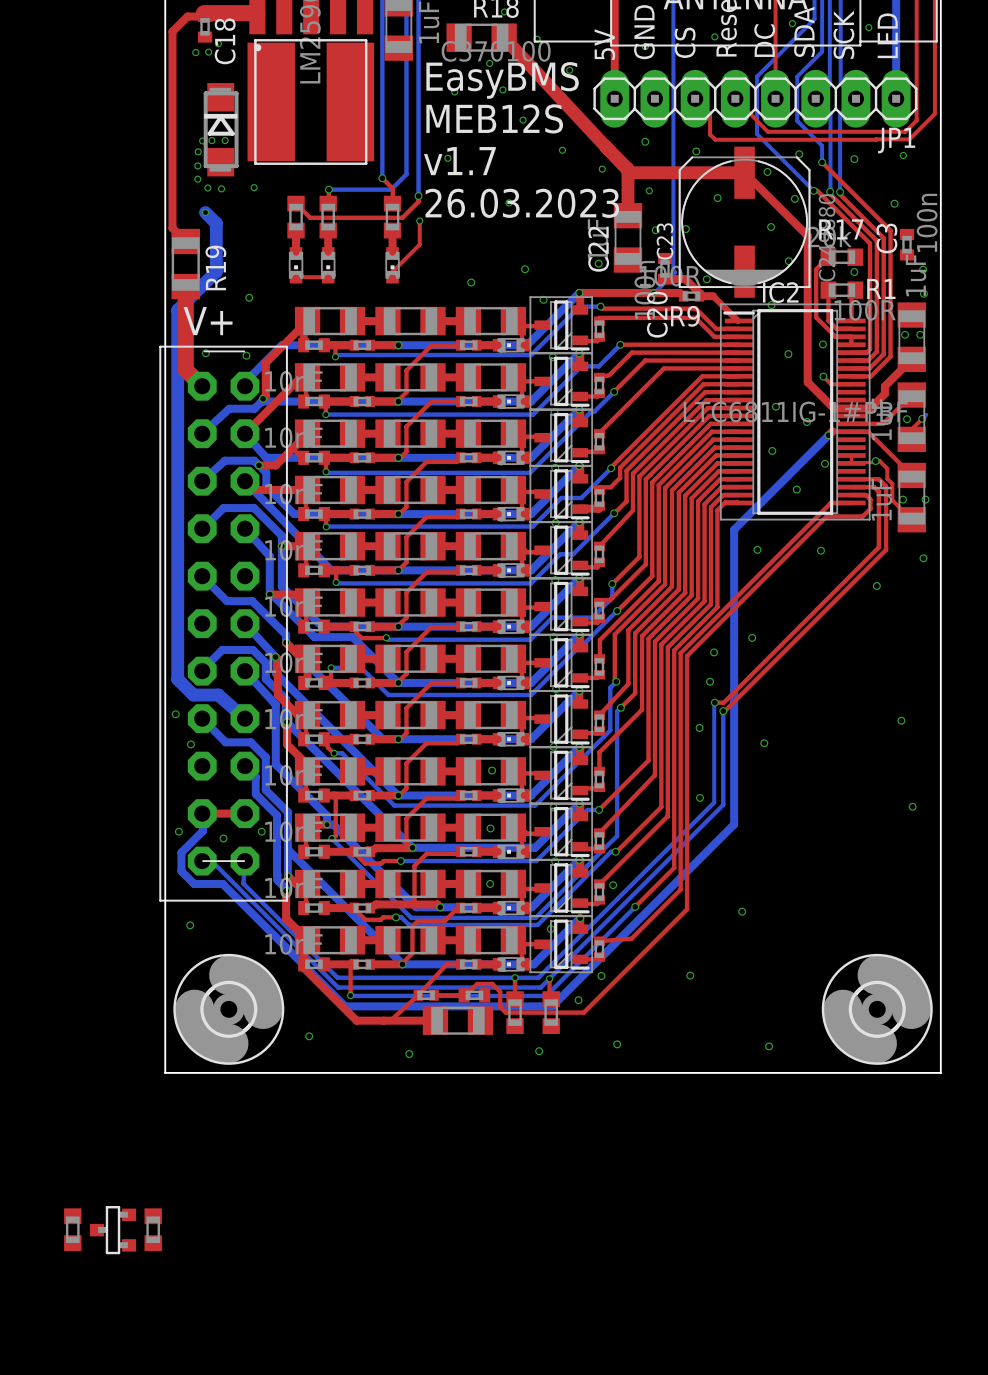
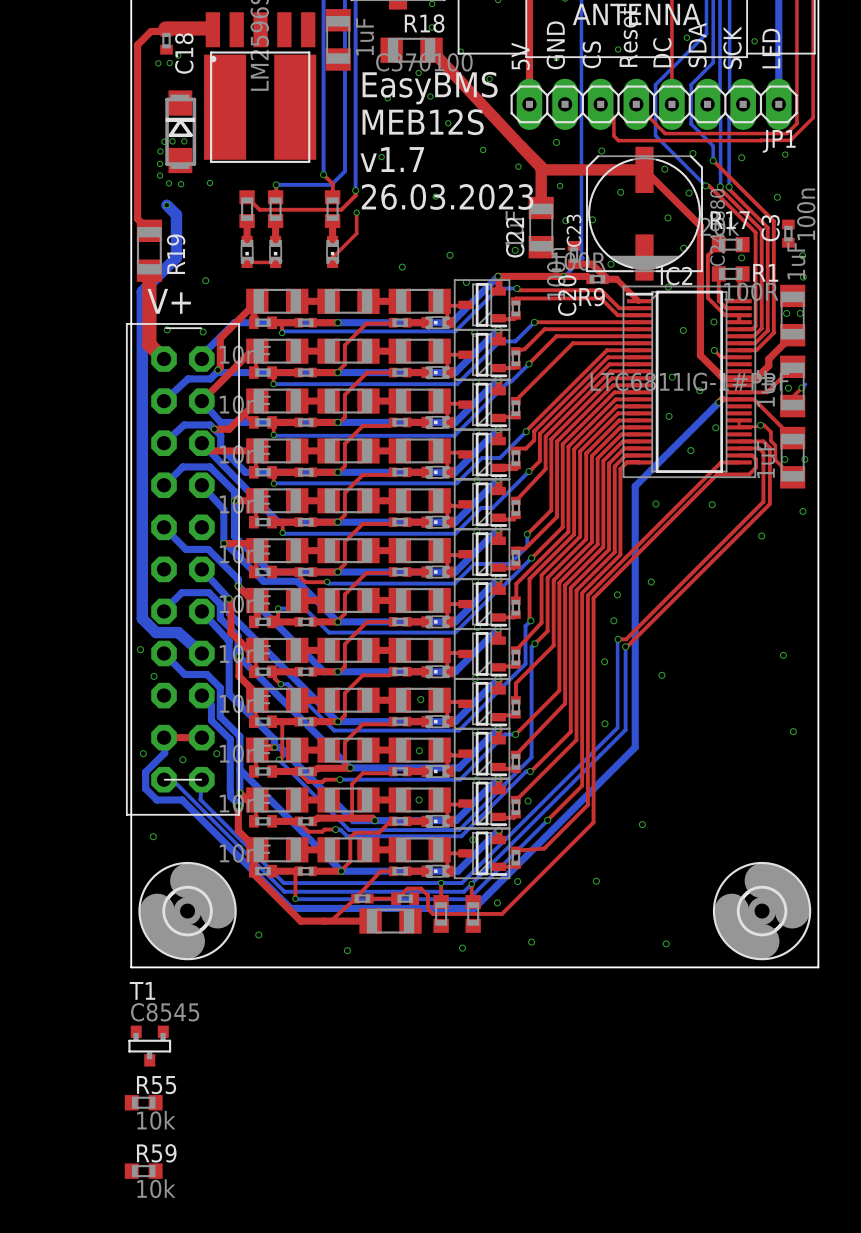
T1: none -> C8545 (149, 1046)
R55: none -> 10k (143, 1102)
part: (72, 1229) -> none
part: (153, 1229) -> none
part: (112, 1230) -> none
R59: none -> 10k (143, 1171)

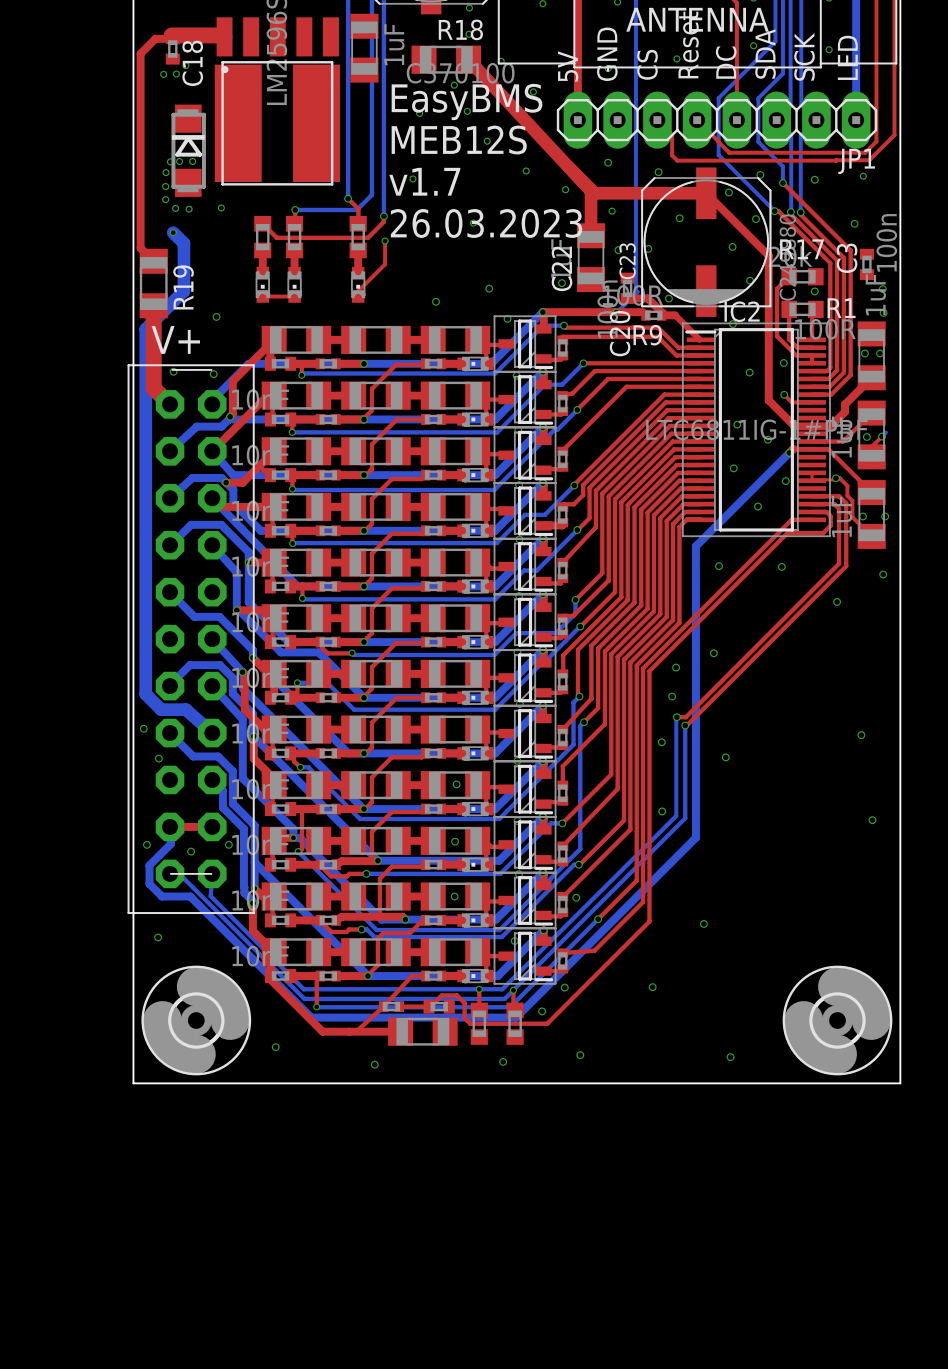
T1: C8545 (149, 1046) -> none
R55: 10k (143, 1102) -> none
R59: 10k (143, 1171) -> none

